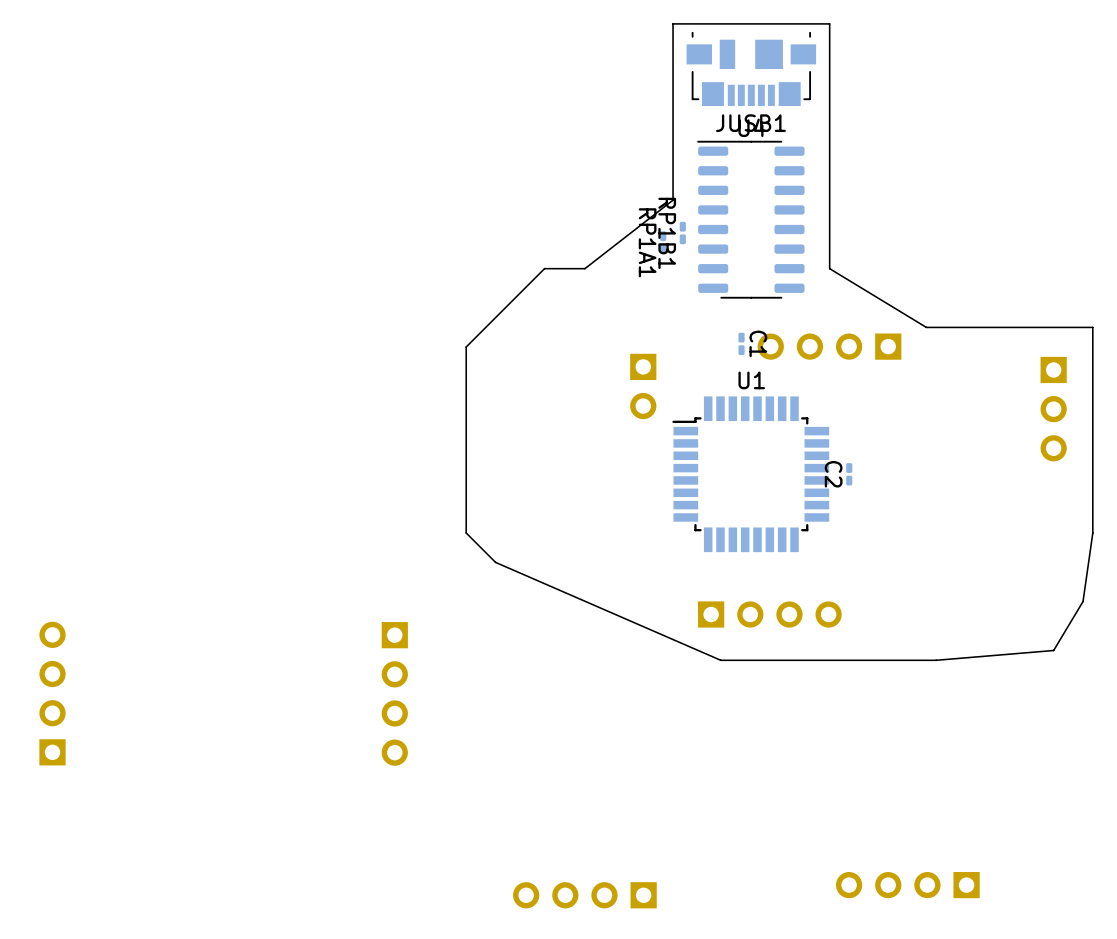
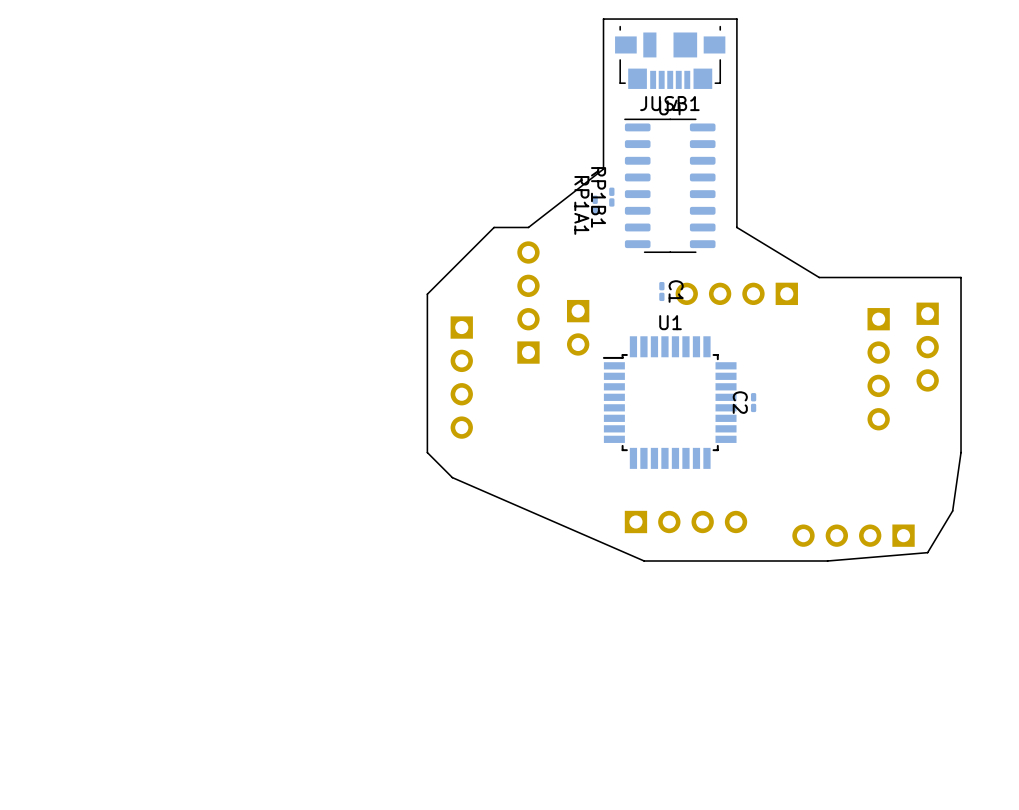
part: none -> (528, 302)
part: none -> (878, 369)
part: none -> (461, 377)
part: none -> (853, 535)
part: (52, 693) -> none
part: (394, 693) -> none
part: (907, 885) -> none
part: (584, 895) -> none

